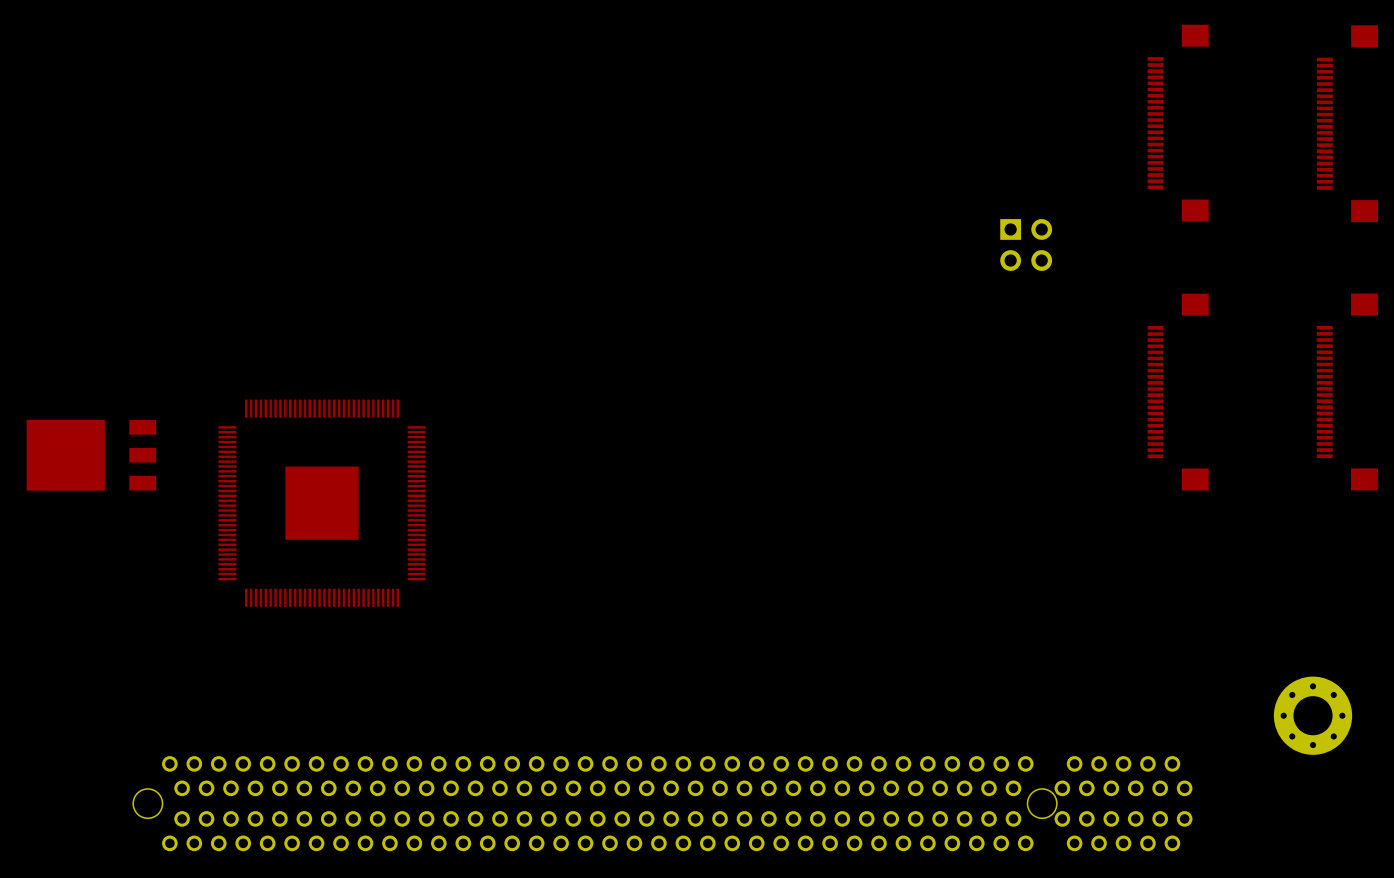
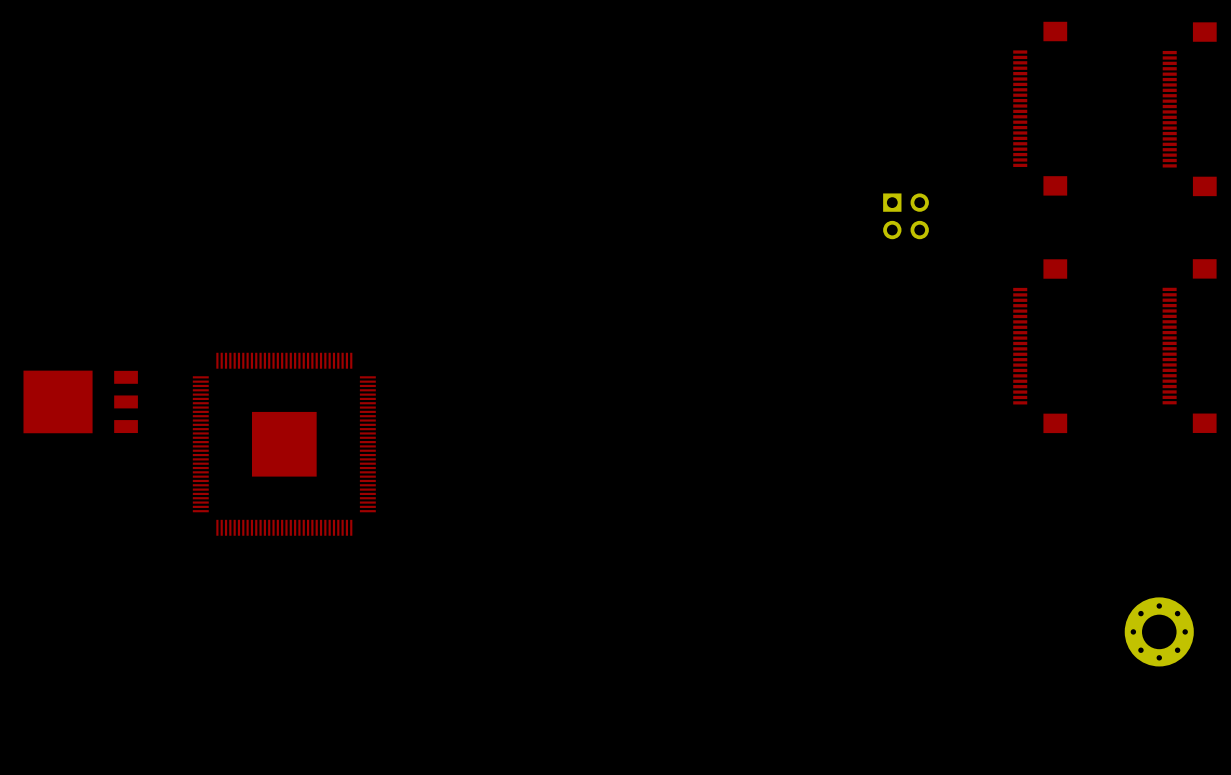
part: (662, 803) -> none

